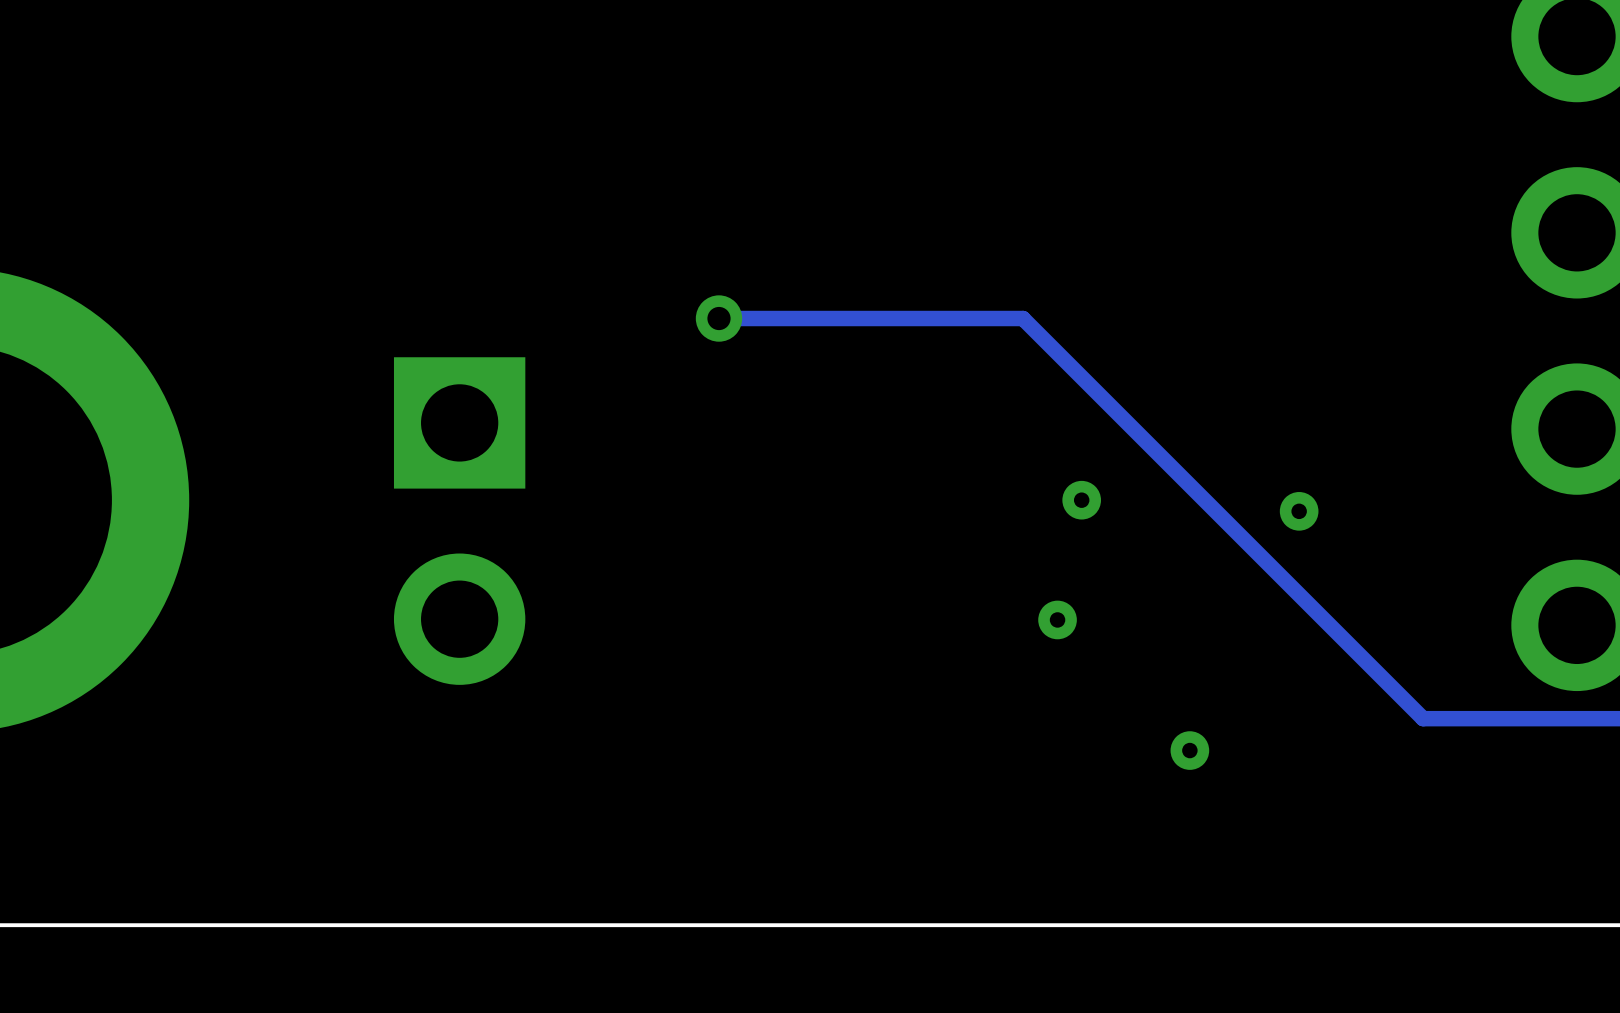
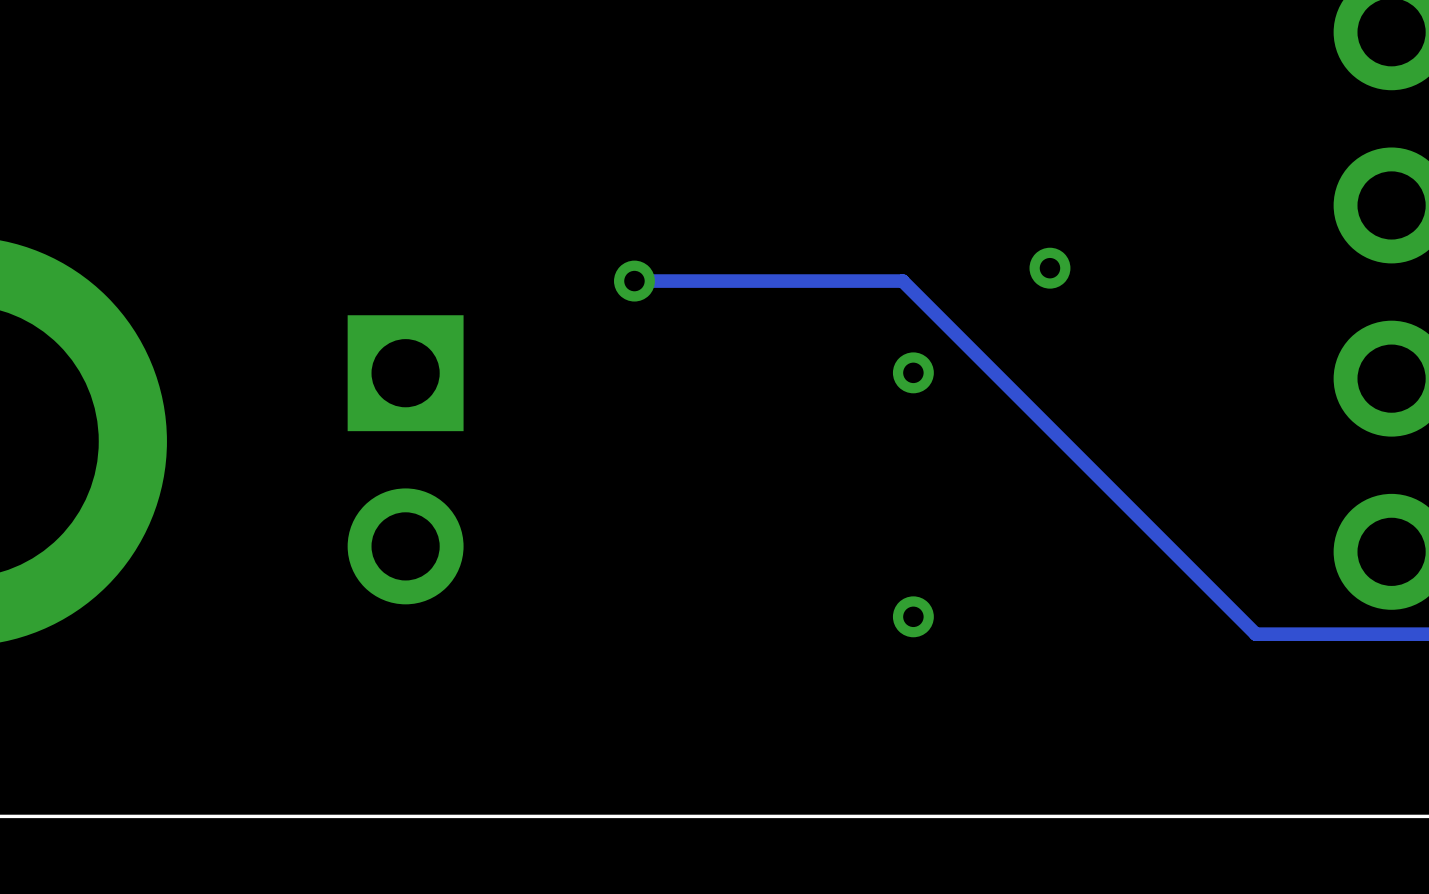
via: none -> (1049, 268)
via: none -> (913, 372)
via: (1081, 500) -> none
via: (1299, 511) -> none
via: (1057, 619) -> none
via: none -> (913, 616)
via: (1189, 750) -> none

